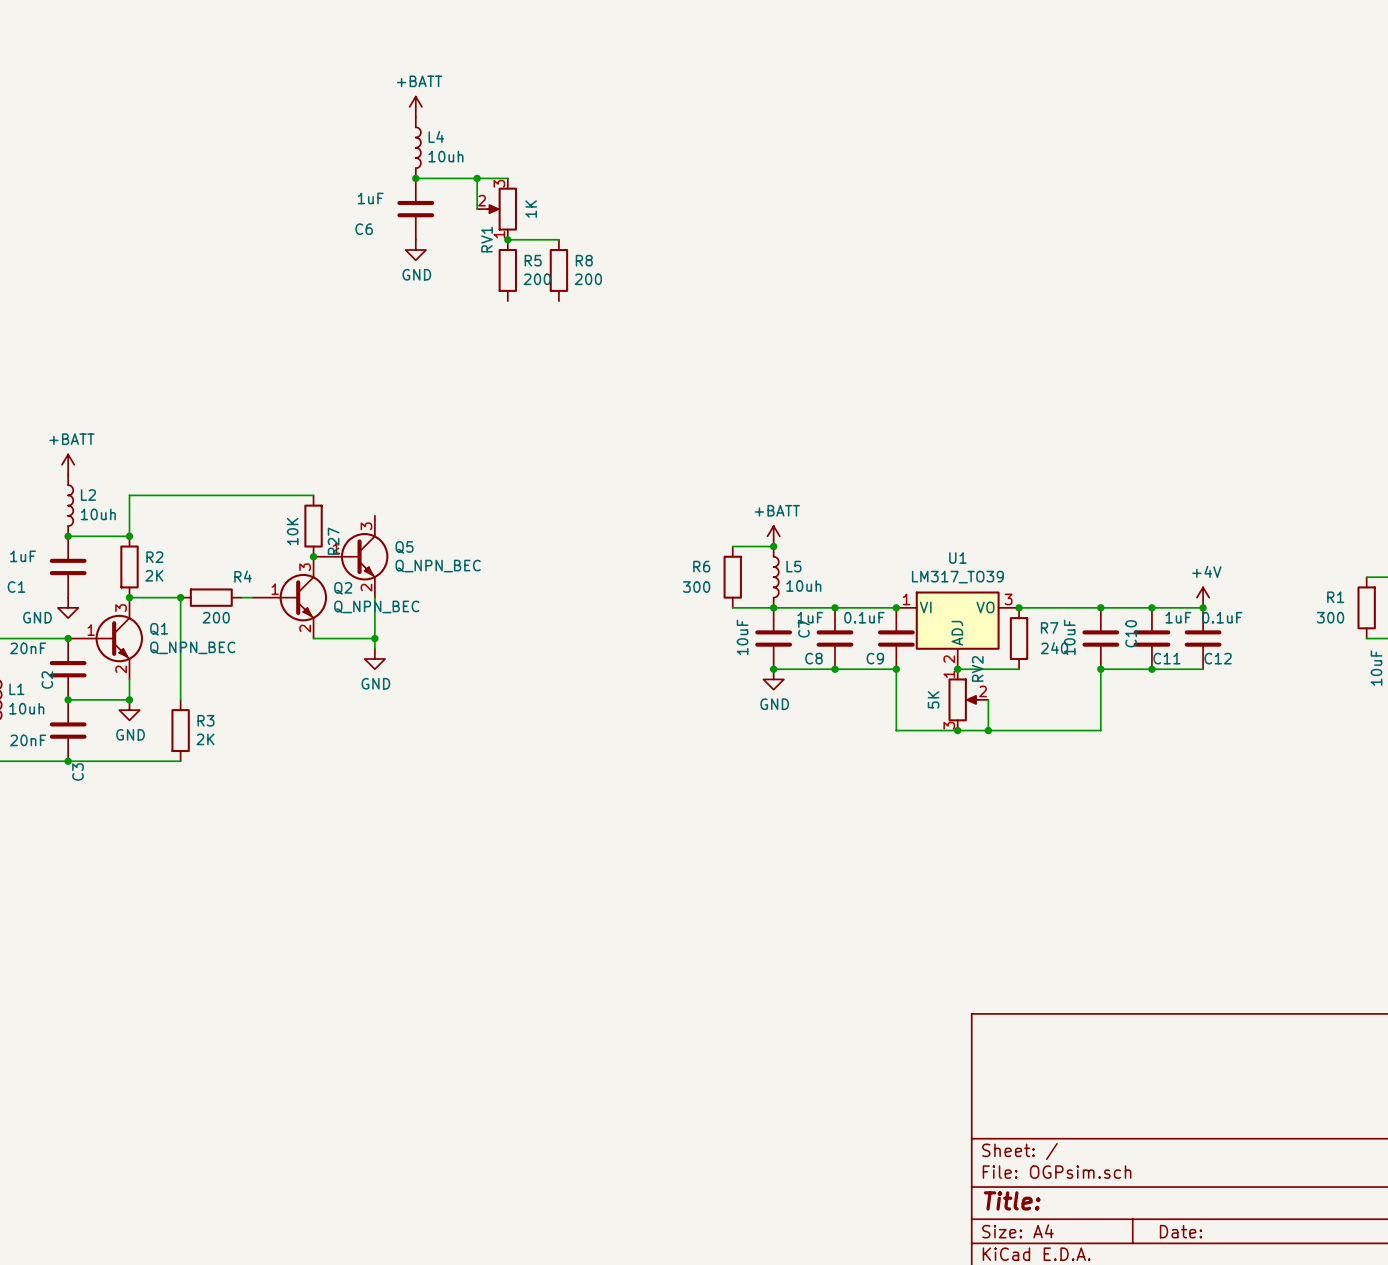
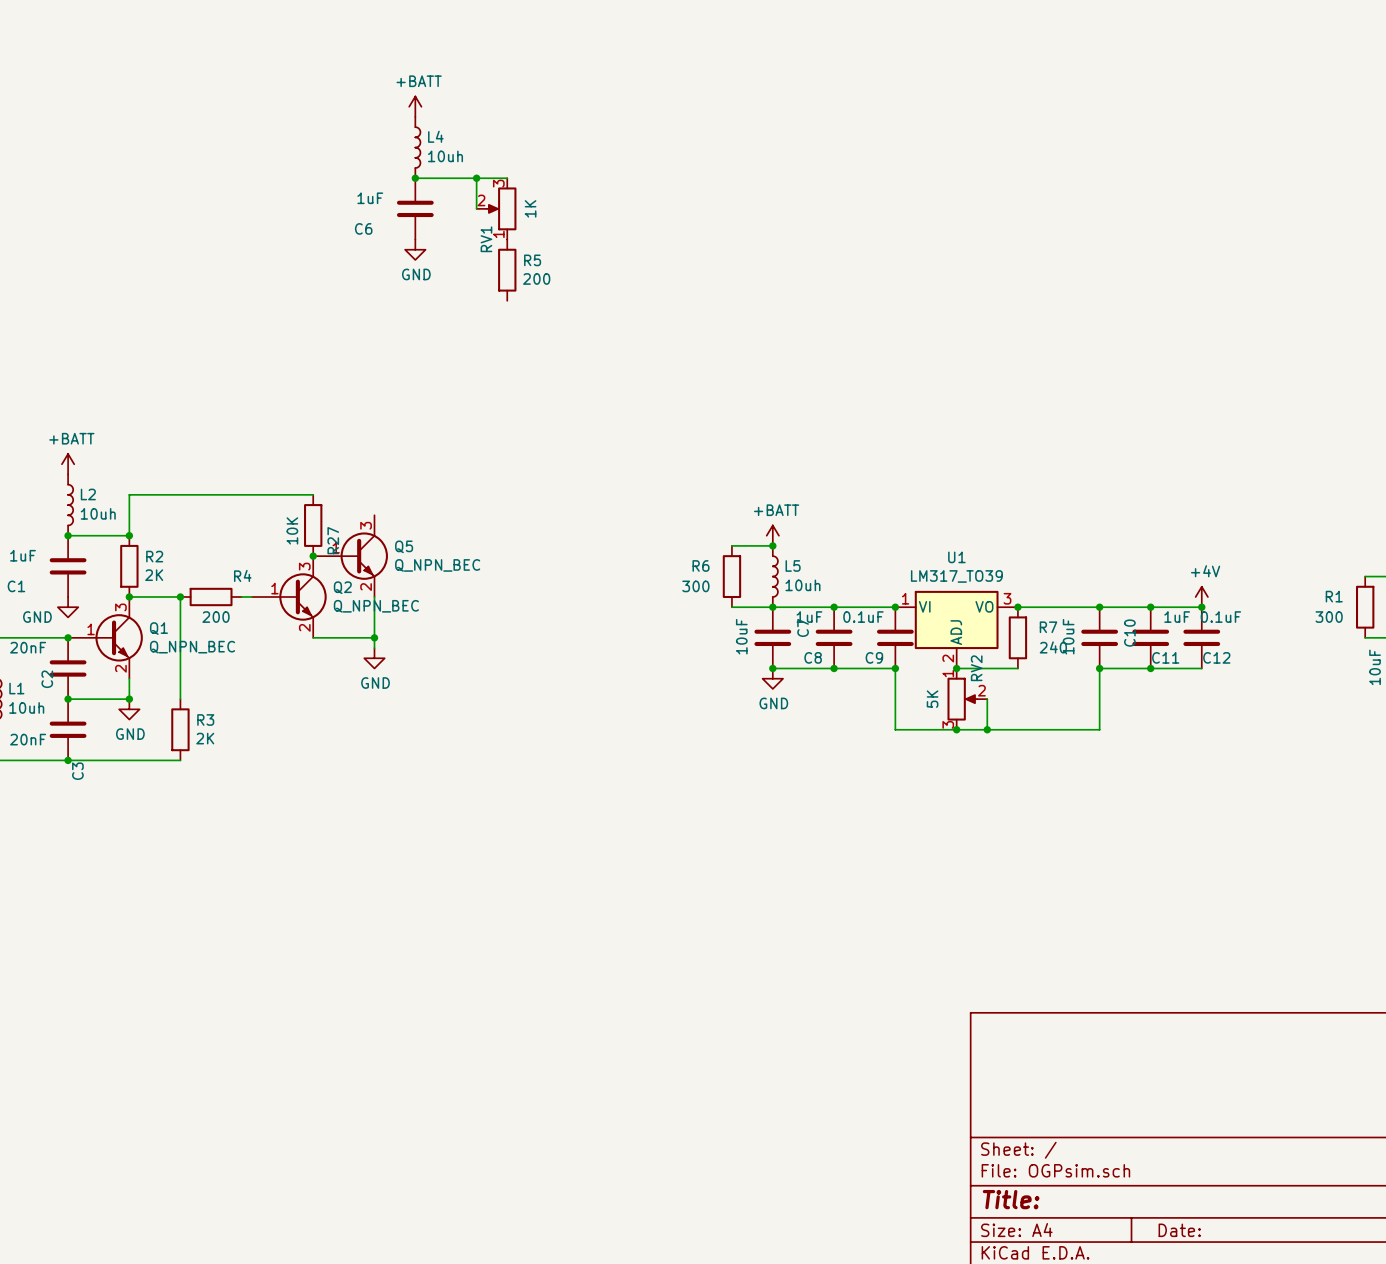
wire: (507, 239) (558, 239) -> none
junction: (507, 239) -> none
R8: 200 (558, 270) -> none

